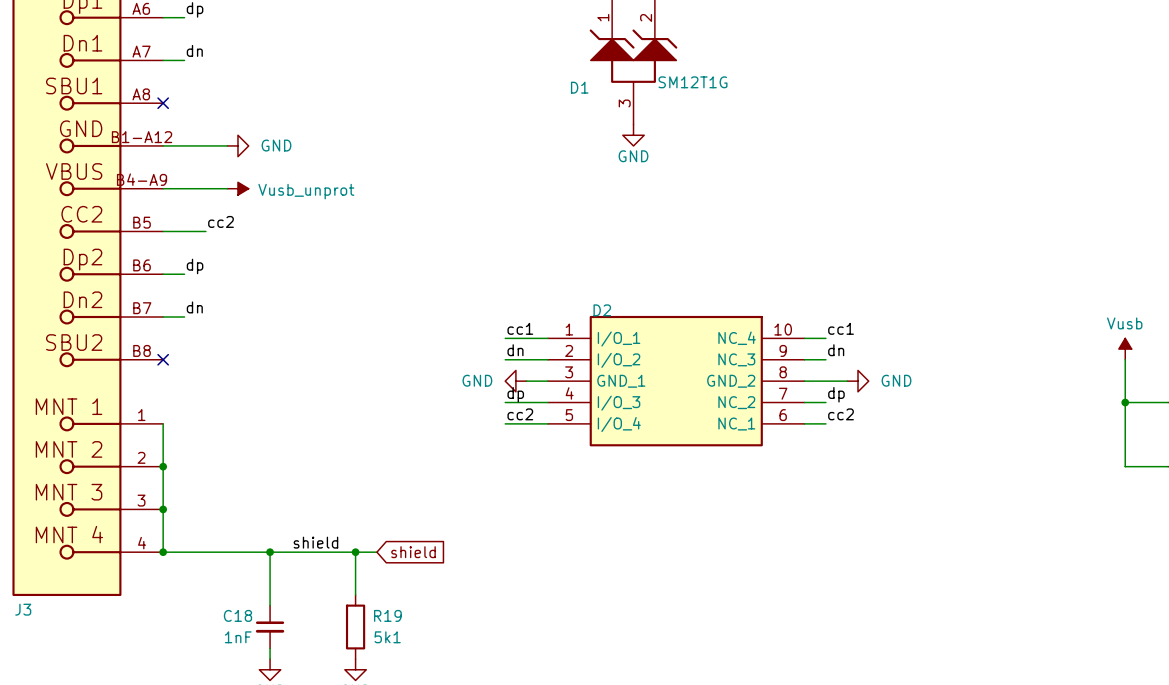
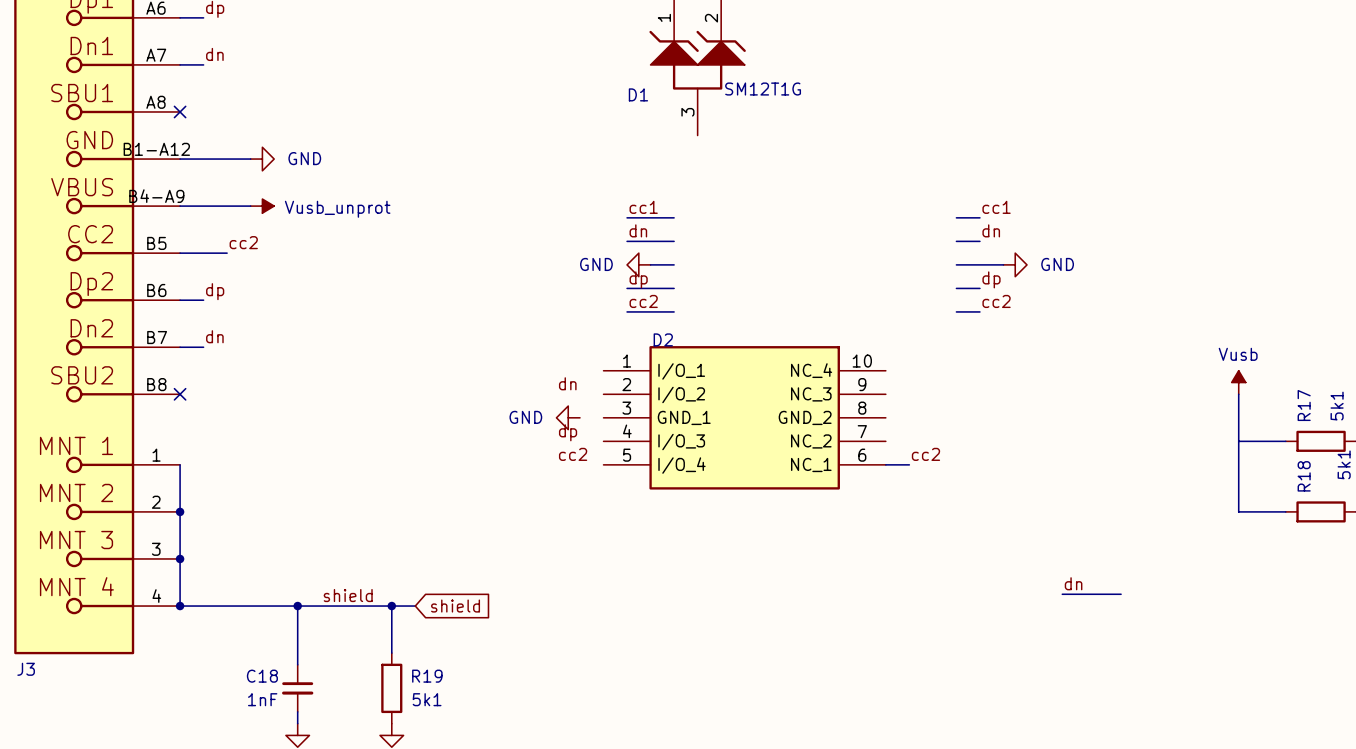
power symbol rotation: 0° (633, 135) -> 90° clockwise (638, 264)
power symbol position: GND (633, 135) -> GND (638, 264)
power symbol text position: GND (633, 156) -> GND (596, 264)
label: none -> cc1 (643, 207)
label: none -> cc1 (996, 207)
label: none -> dn (638, 230)
label: none -> dn (991, 230)
label: none -> dp (638, 279)
label: none -> dp (991, 279)
label: none -> cc2 (643, 301)
label: none -> cc2 (996, 301)
wire: none -> (956, 311) (979, 311)
label: cc1 (520, 328) -> none
label: cc1 (841, 328) -> none
wire: (505, 338) (547, 338) -> (627, 217) (674, 217)
wire: (804, 338) (825, 338) -> (956, 217) (979, 217)
label: dn (836, 350) -> none
wire: (505, 359) (547, 359) -> (627, 241) (674, 241)
wire: (804, 359) (825, 359) -> (956, 241) (979, 241)
wire: (526, 381) (547, 381) -> (650, 264) (674, 264)
wire: (804, 381) (847, 381) -> (956, 264) (1003, 264)
power symbol position: GND (858, 381) -> GND (1015, 264)
label: dp (836, 394) -> none
wire: (505, 402) (547, 402) -> (627, 288) (674, 288)
wire: (804, 402) (825, 402) -> (956, 288) (979, 288)
junction: (1125, 402) -> none
wire: (505, 423) (547, 423) -> (627, 311) (674, 311)
label: none -> dn (1073, 583)
wire: none -> (1062, 594) (1121, 594)

